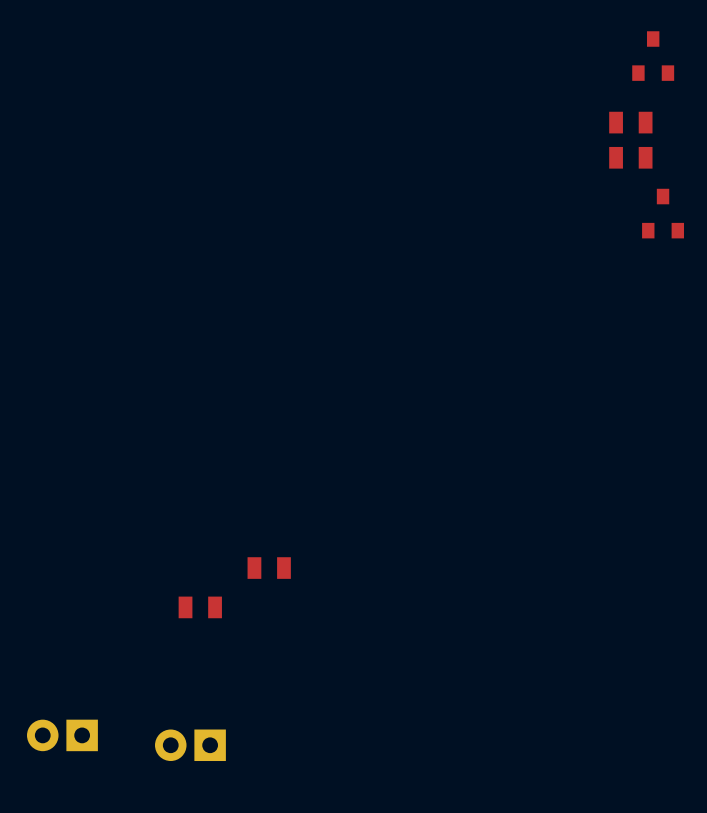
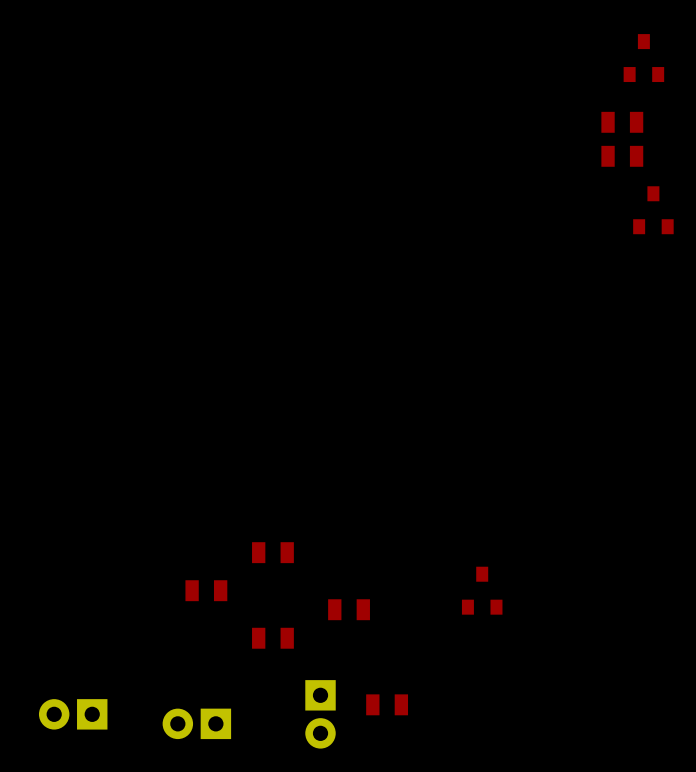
part: none -> (482, 590)
part: none -> (349, 609)
part: none -> (272, 638)
part: none -> (387, 704)
part: none -> (320, 714)

